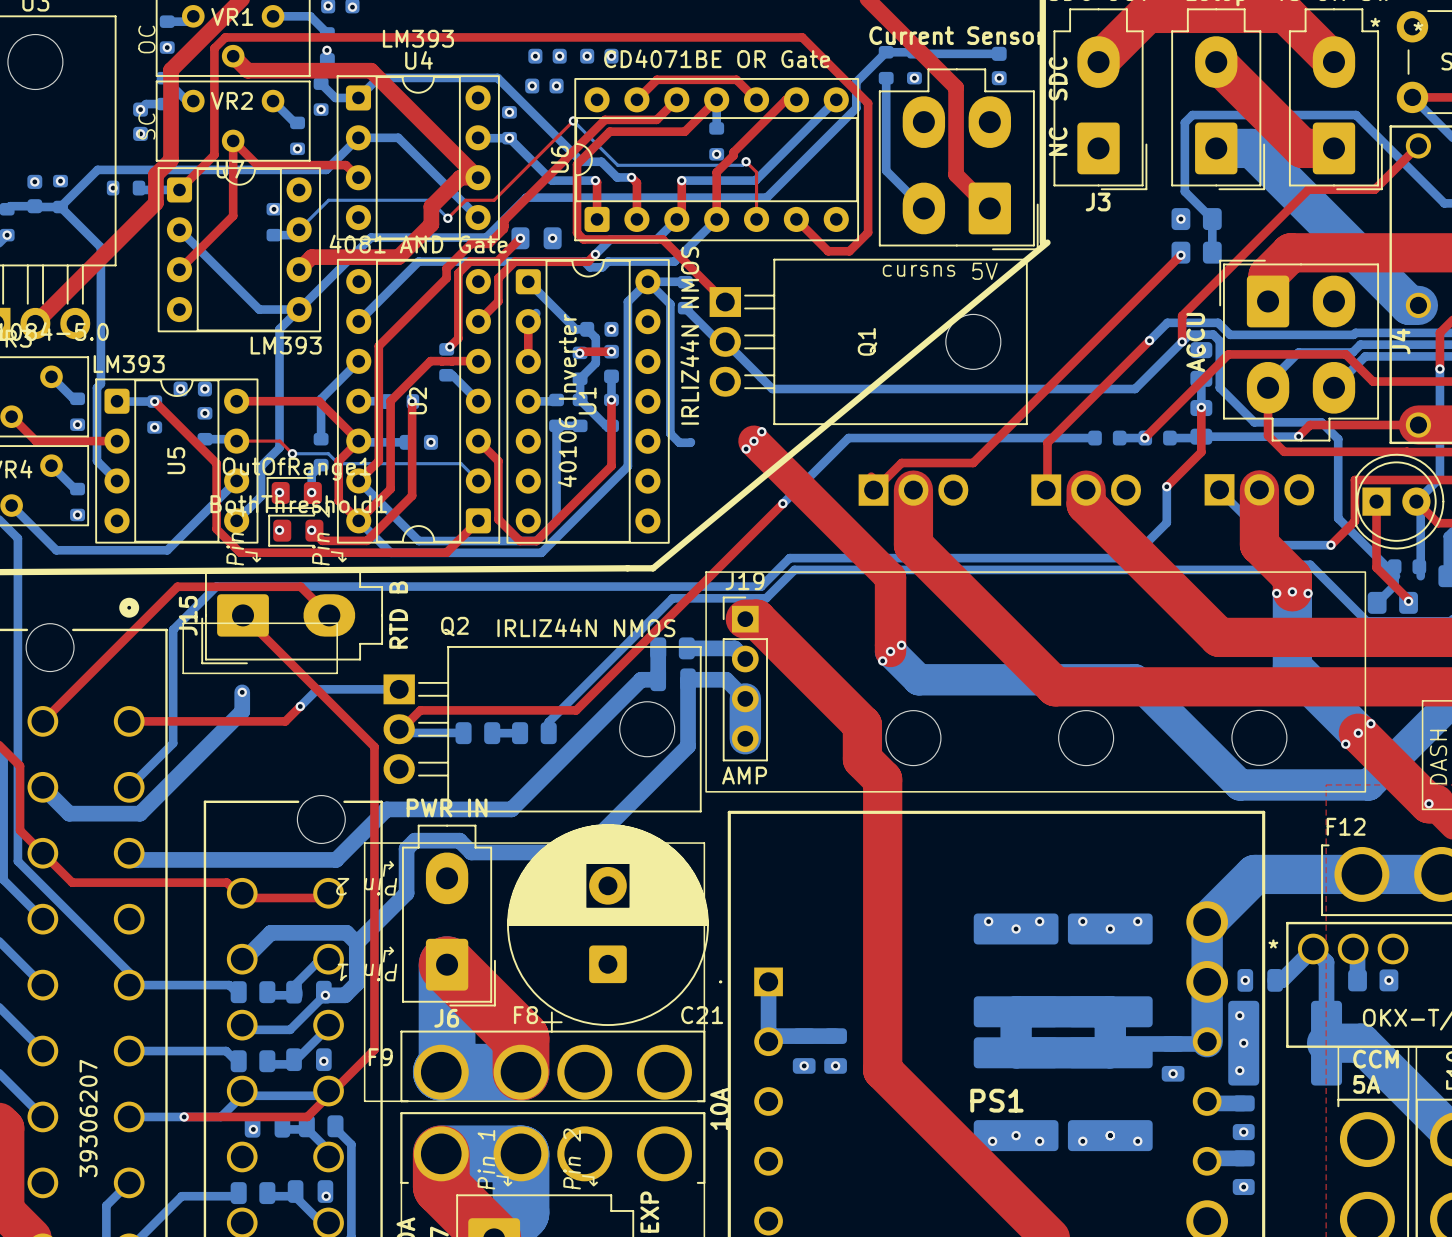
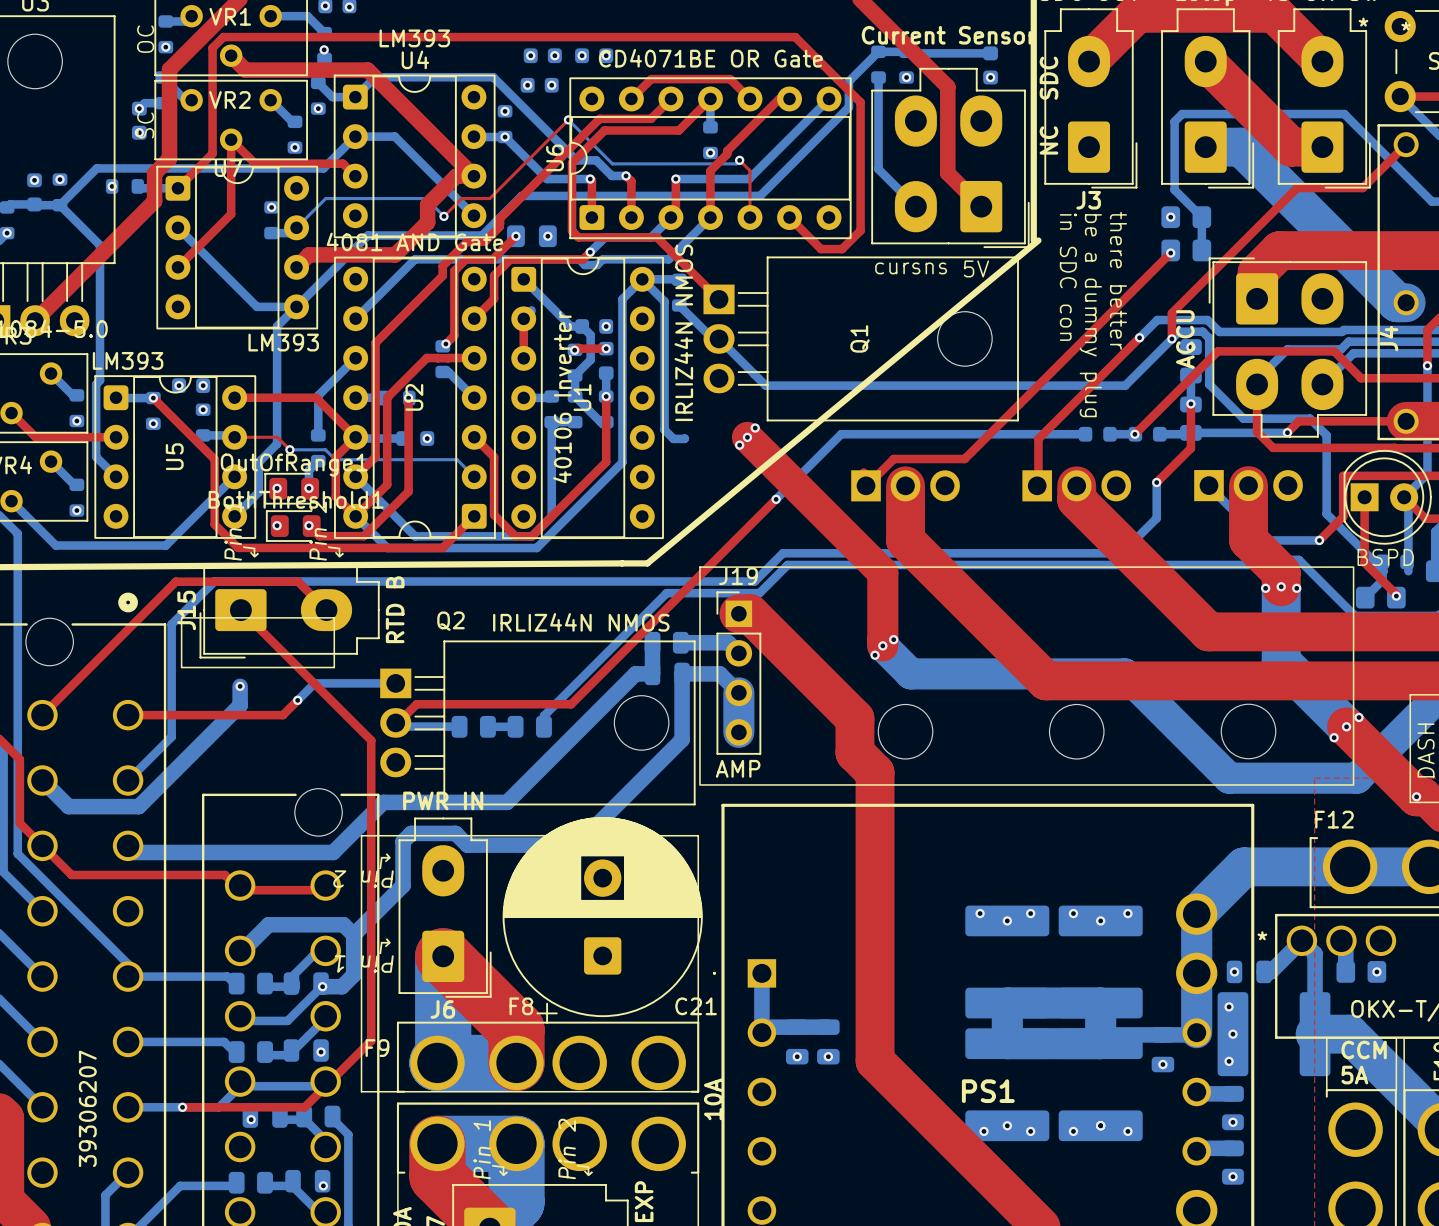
text: none -> in SDC con (1068, 277)
text: none -> there better (1118, 280)
text: none -> be a dummy plug (1090, 315)
text: none -> BSPD (1385, 557)

